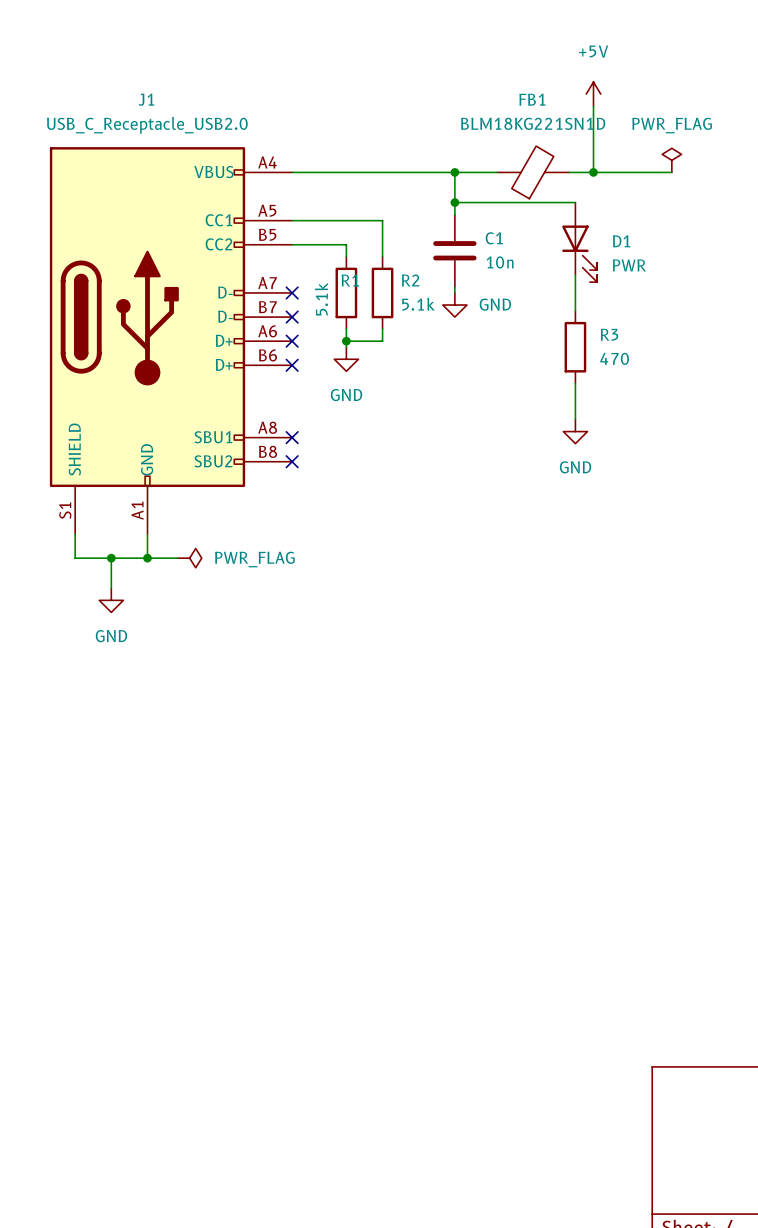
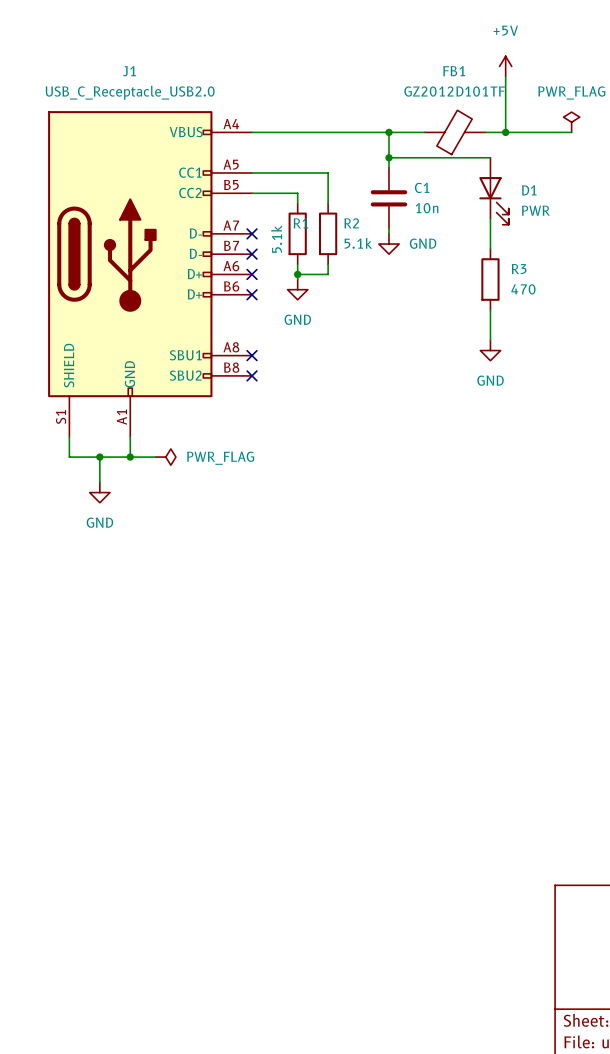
FB1 value: BLM18KG221SN1D (533, 123) -> GZ2012D101TF (454, 91)

